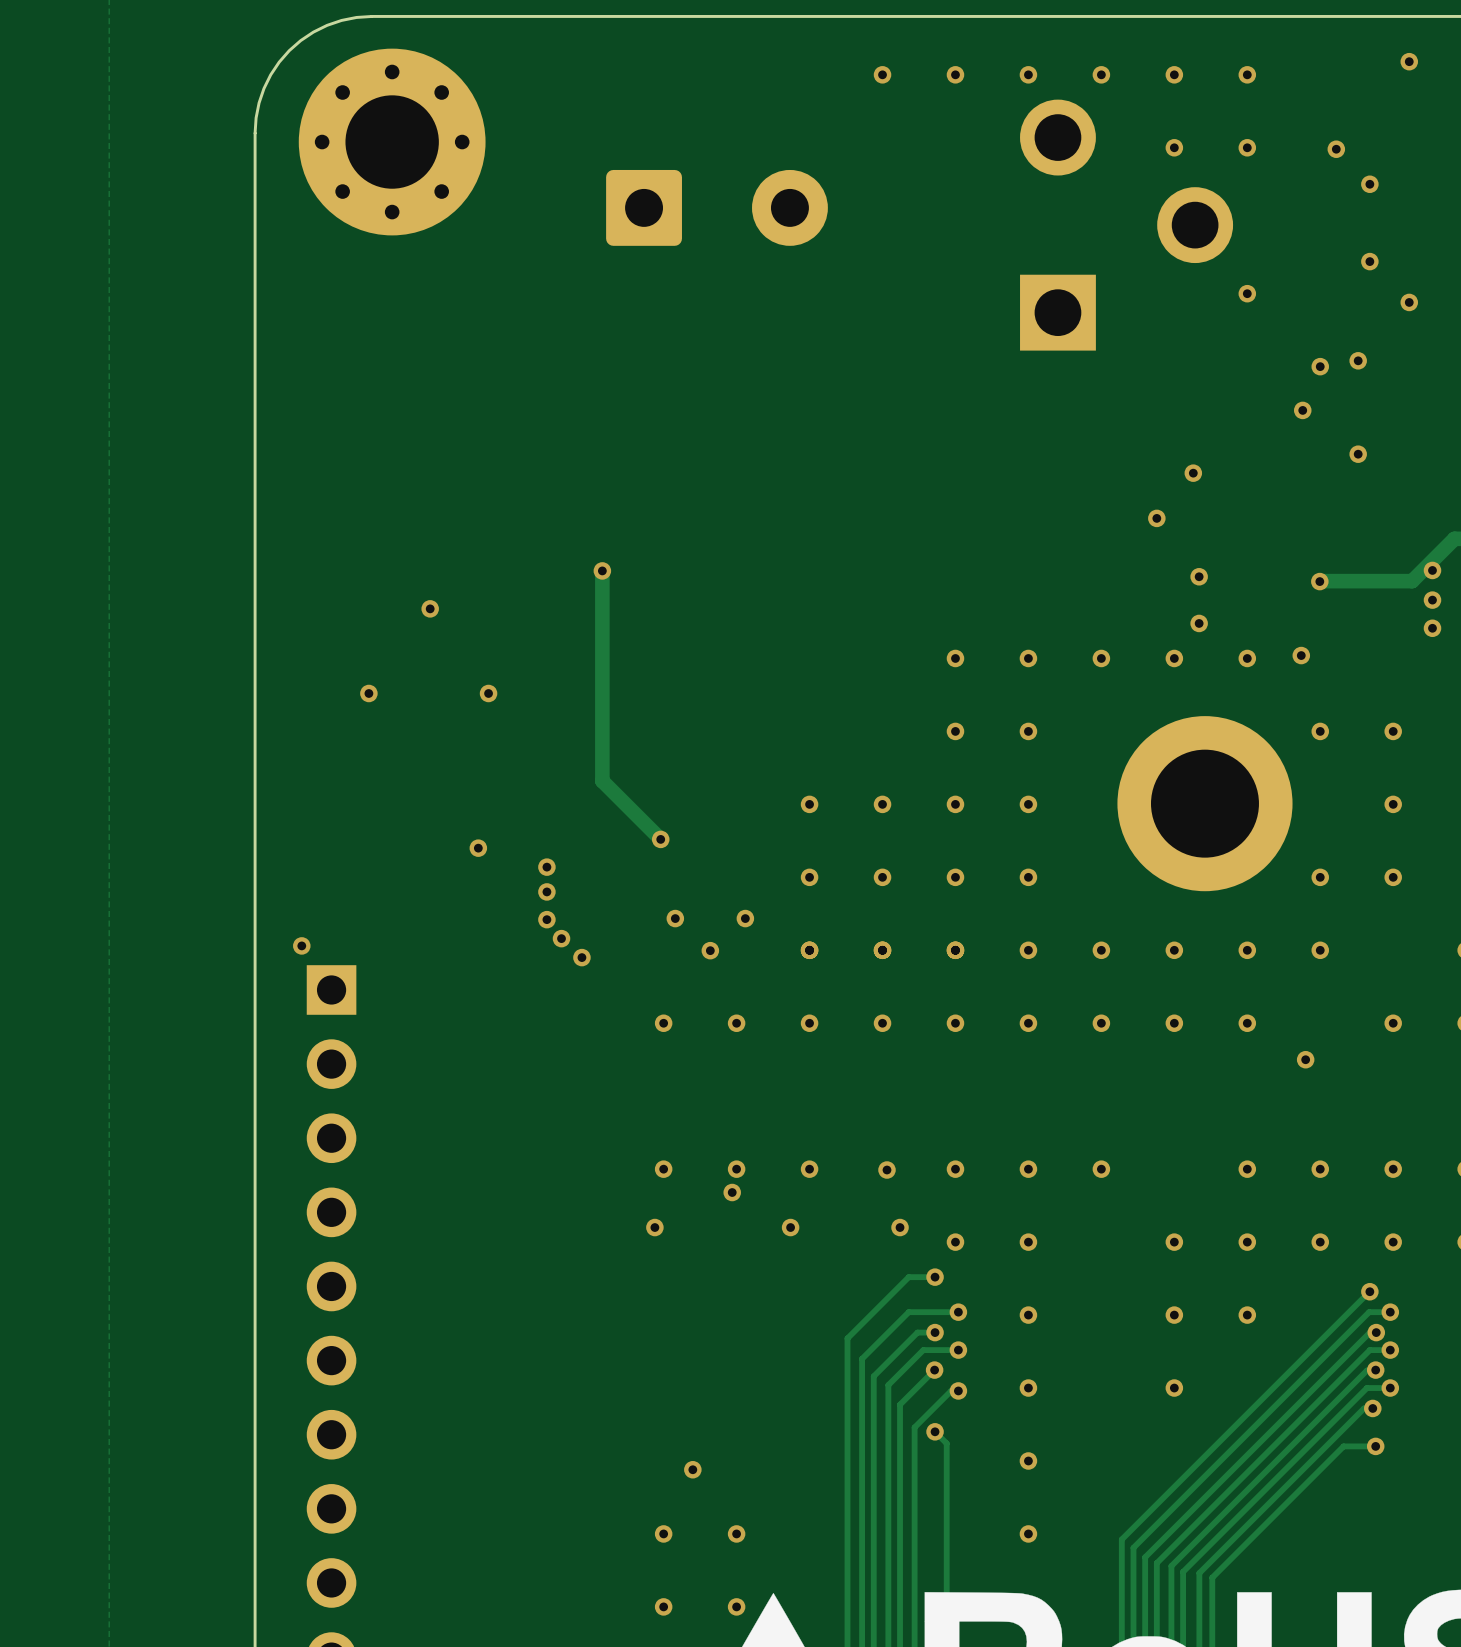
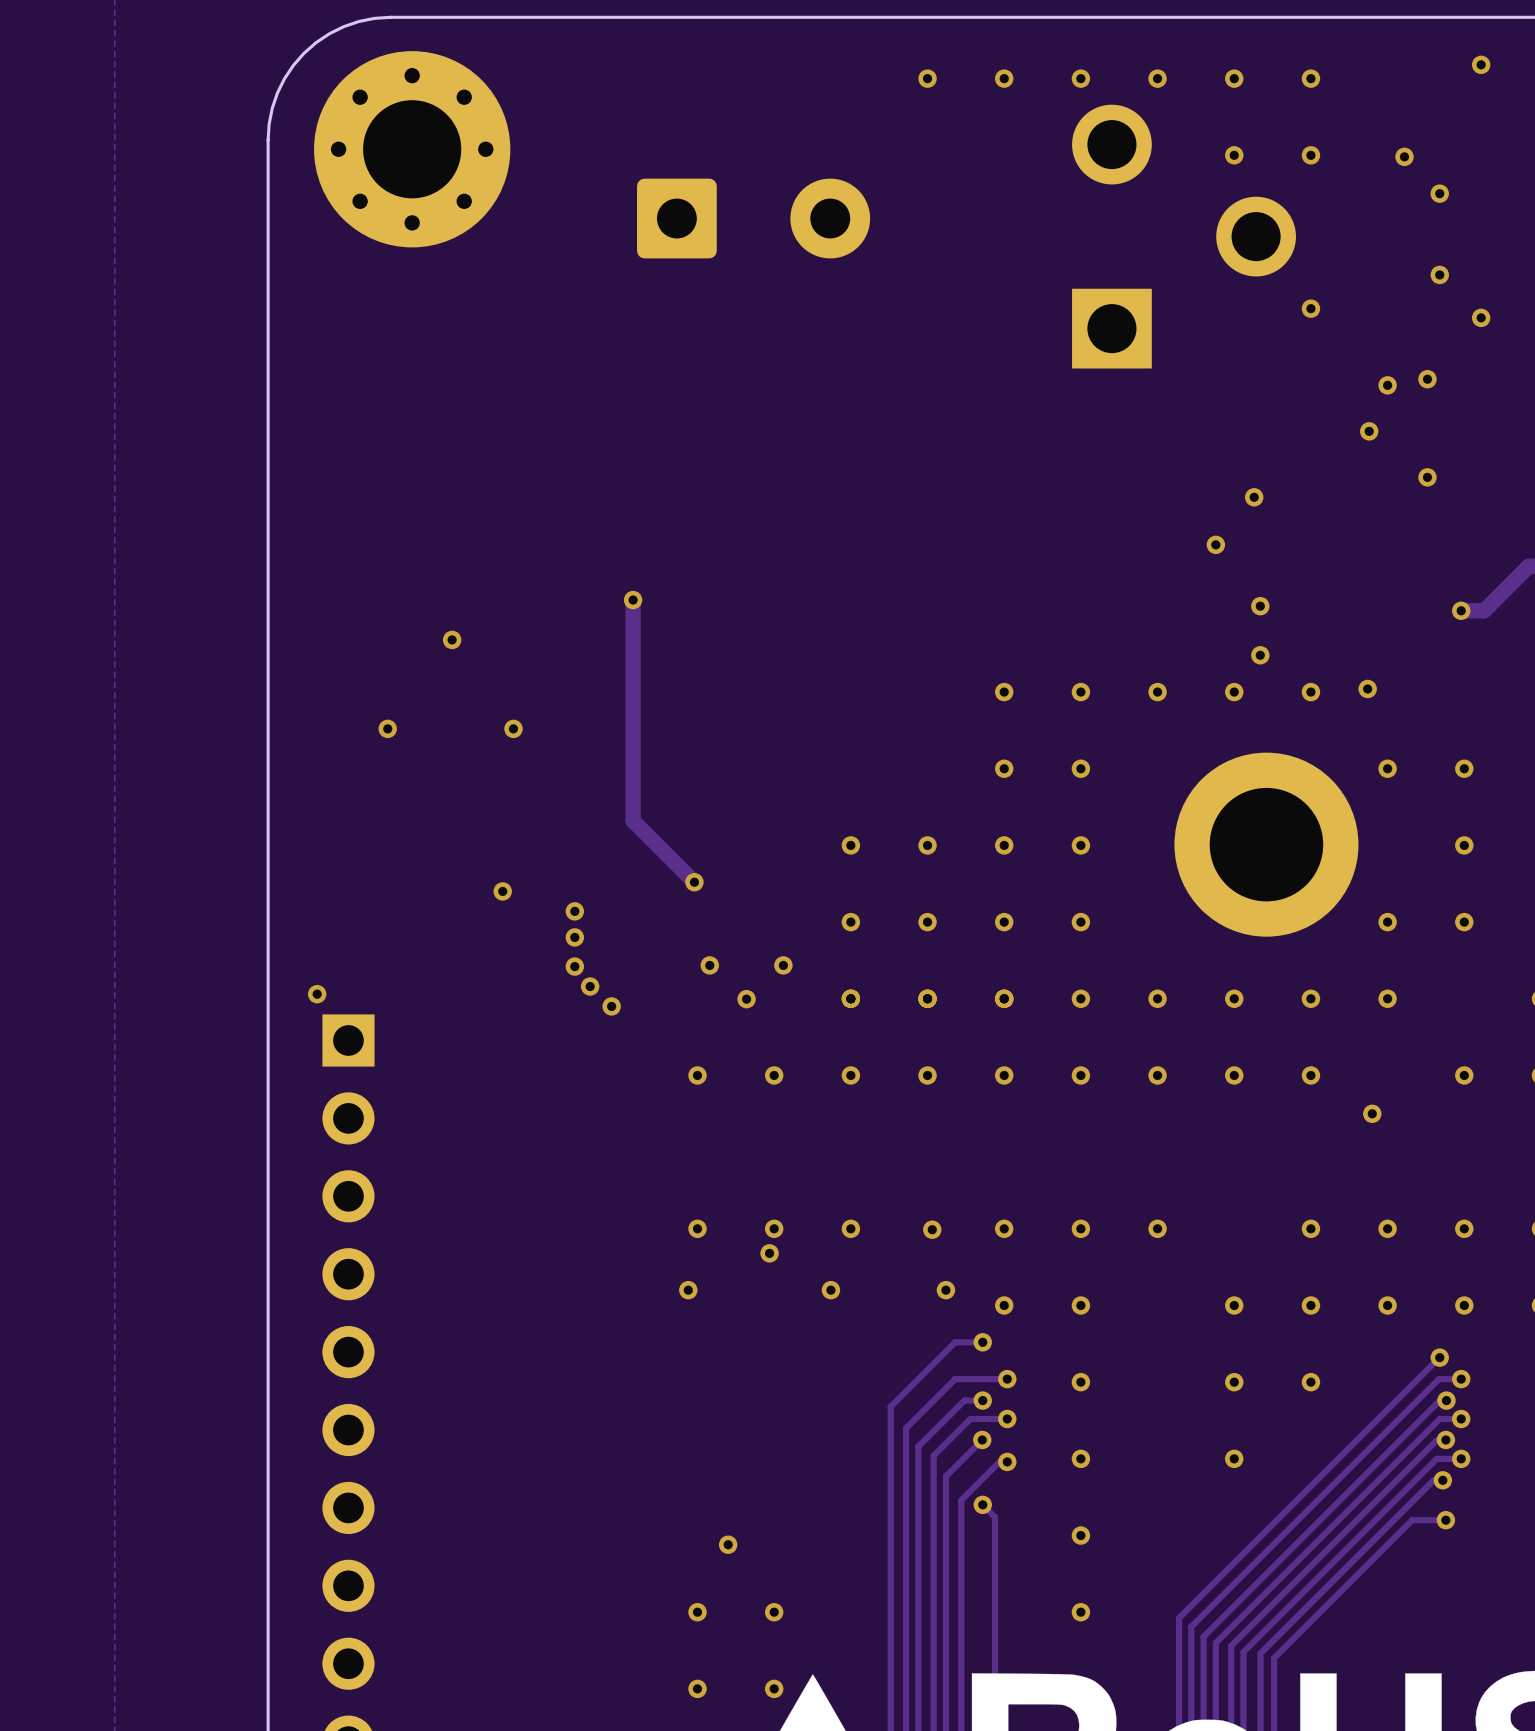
via: (1432, 570) -> none
via: (1319, 581) -> none
track: (1390, 581) (1319, 581) -> none
via: none -> (1461, 610)
via: (1432, 600) -> none
via: (1432, 628) -> none

